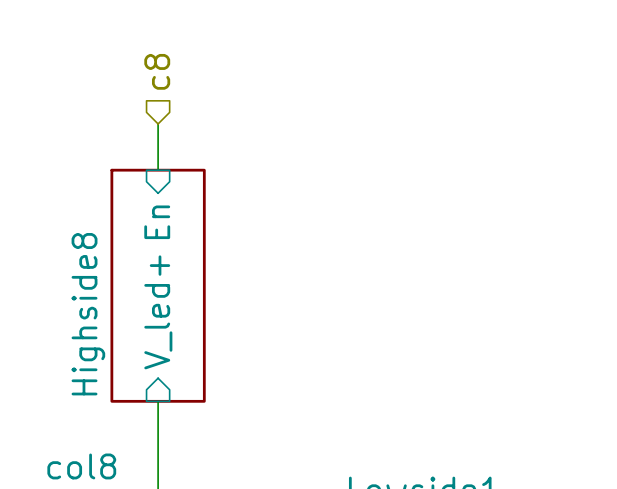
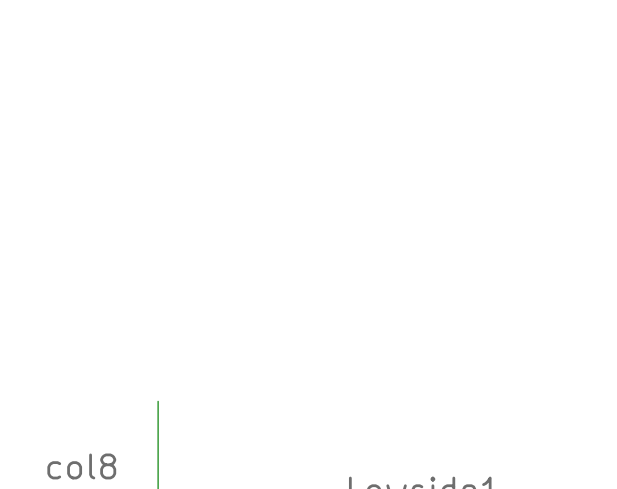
hierarchical label: c8 (157, 71) -> none
wire: (158, 123) (158, 170) -> none
sheet pin: En (157, 222) -> none
sheet Highside8: (158, 285) -> none
sheet pin: V_led+ (158, 312) -> none

